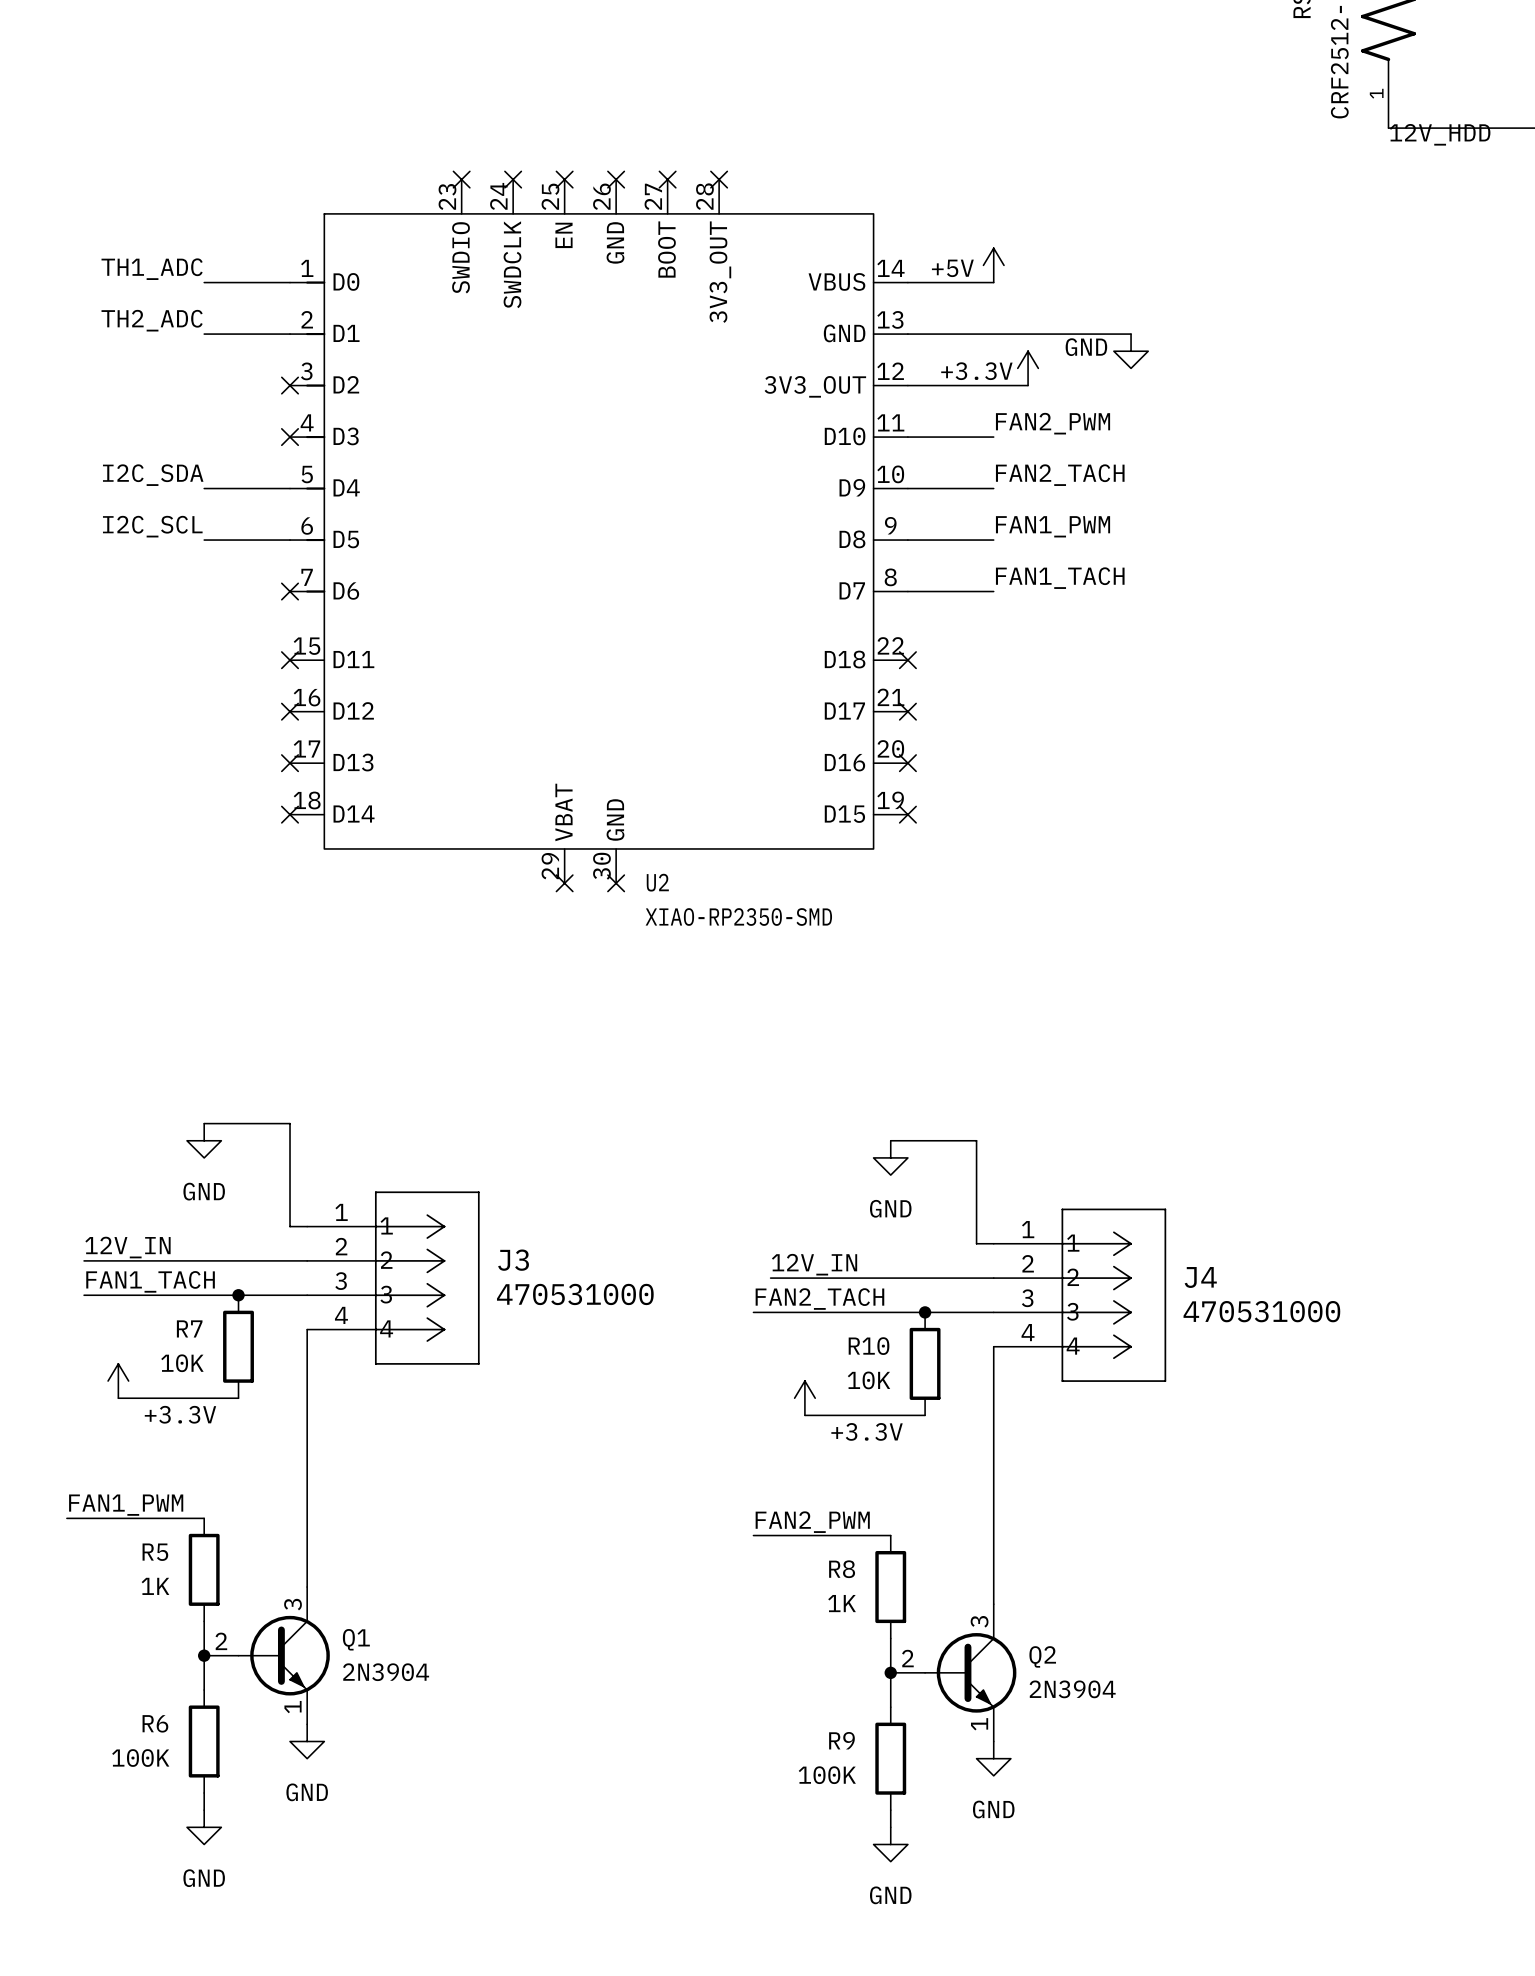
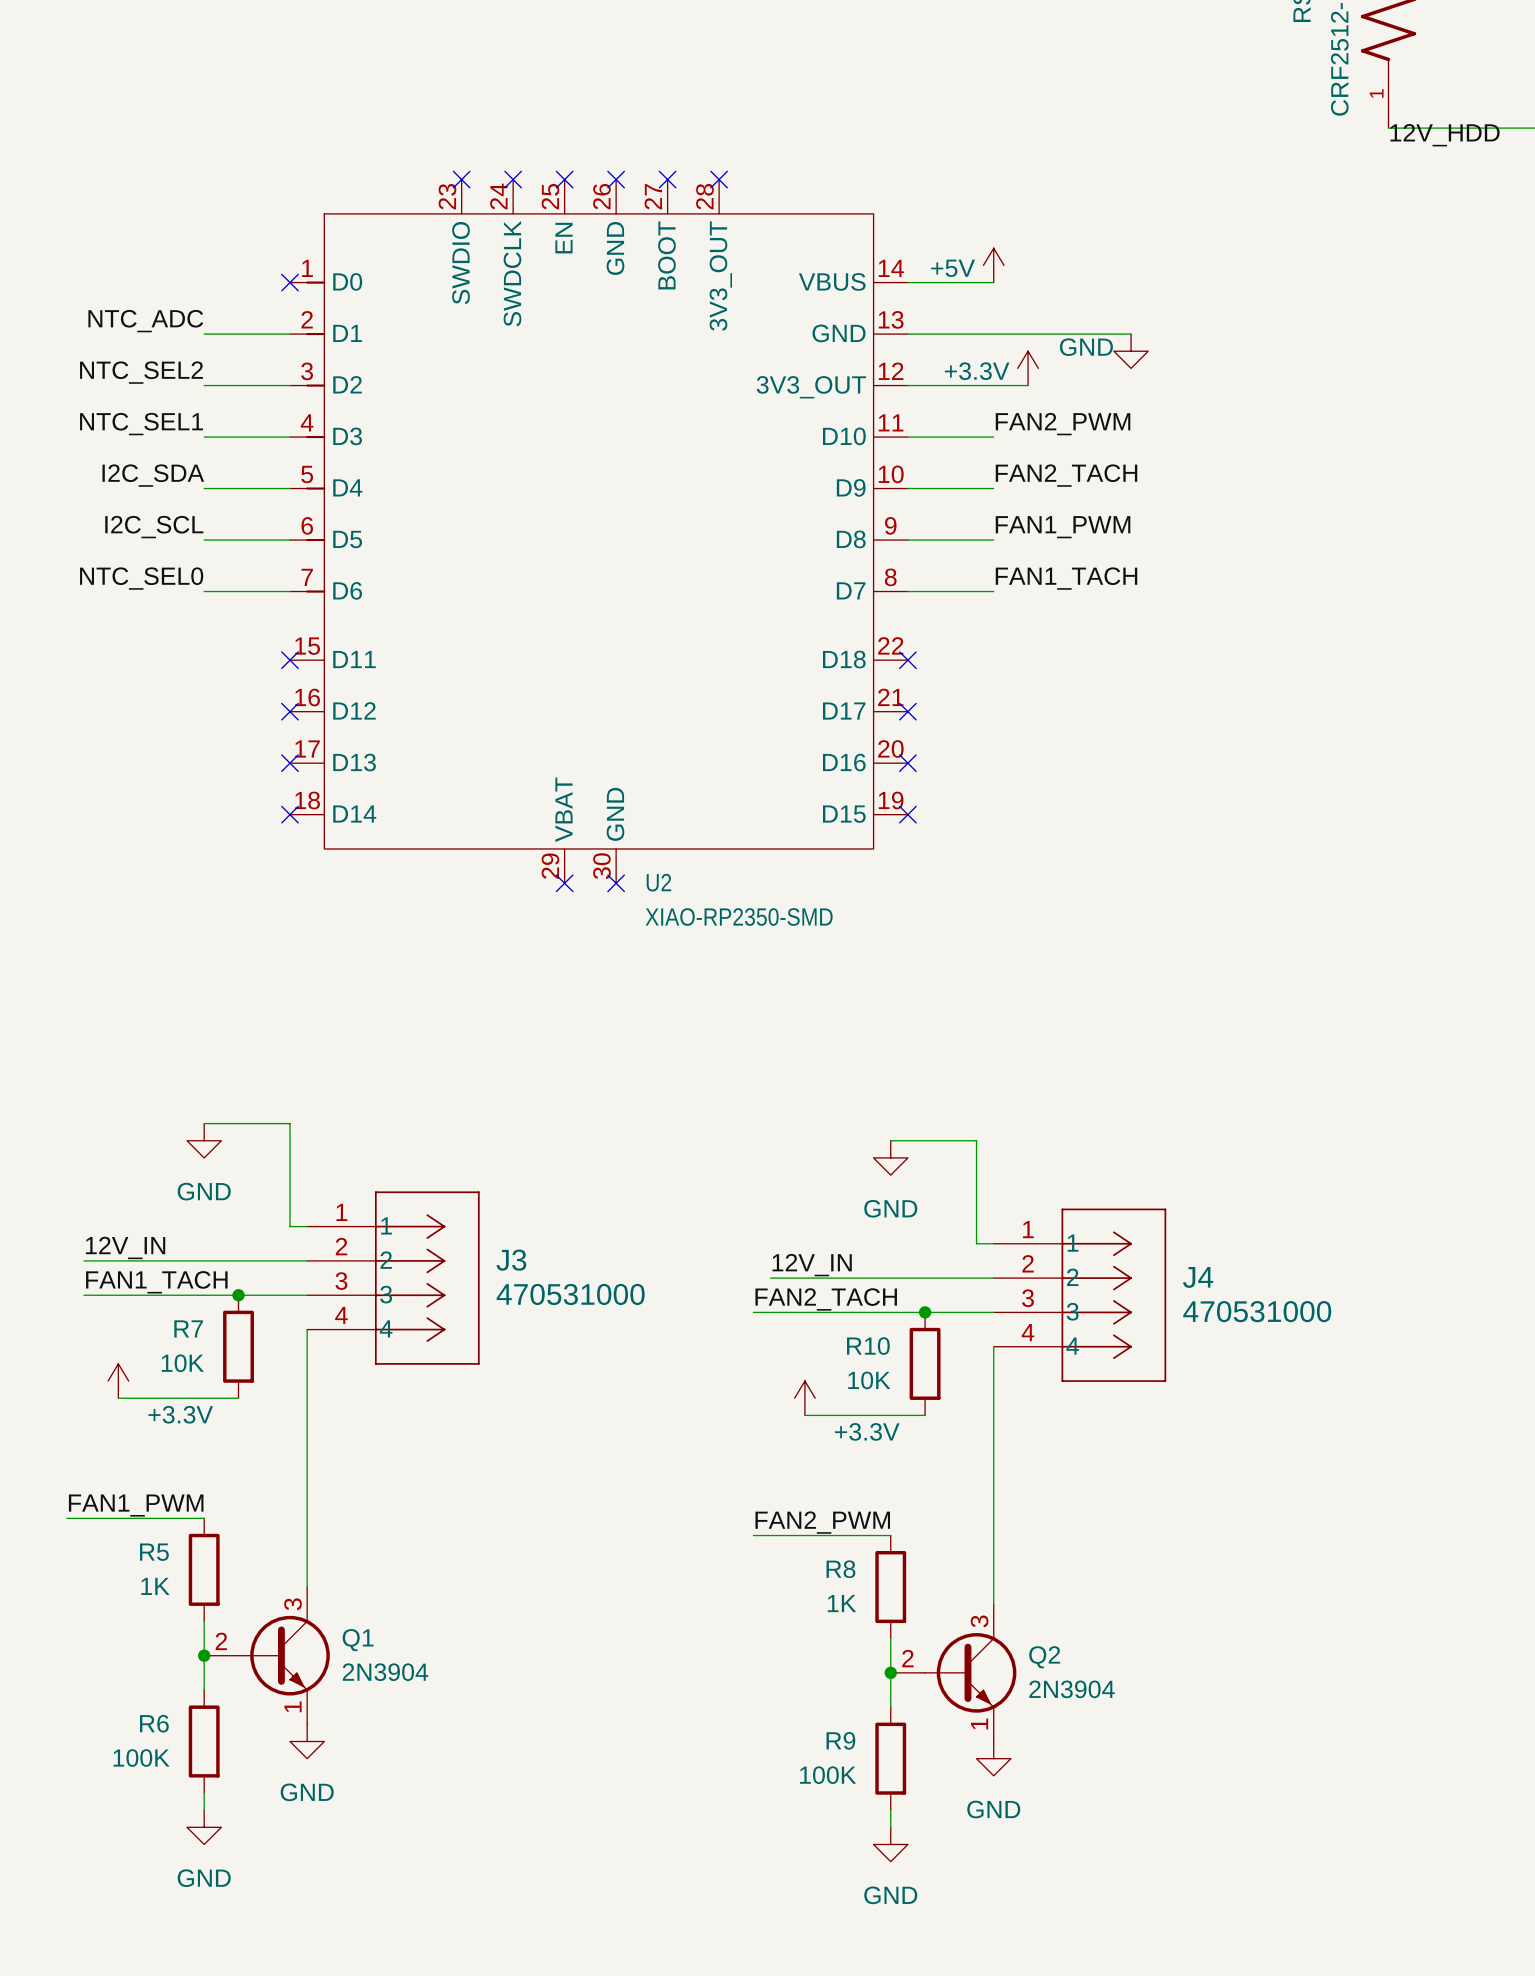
label: TH1_ADC (152, 269) -> none
wire: (204, 282) (290, 282) -> (204, 385) (290, 385)
no-connect mark: none -> (290, 282)
label: TH2_ADC (152, 320) -> NTC_ADC (145, 321)
label: none -> NTC_SEL2 (141, 372)
no-connect mark: (290, 385) -> none
label: none -> NTC_SEL1 (141, 424)
wire: none -> (204, 437) (290, 437)
no-connect mark: (290, 437) -> none
label: none -> NTC_SEL0 (141, 578)
wire: none -> (204, 591) (290, 591)
no-connect mark: (290, 591) -> none

